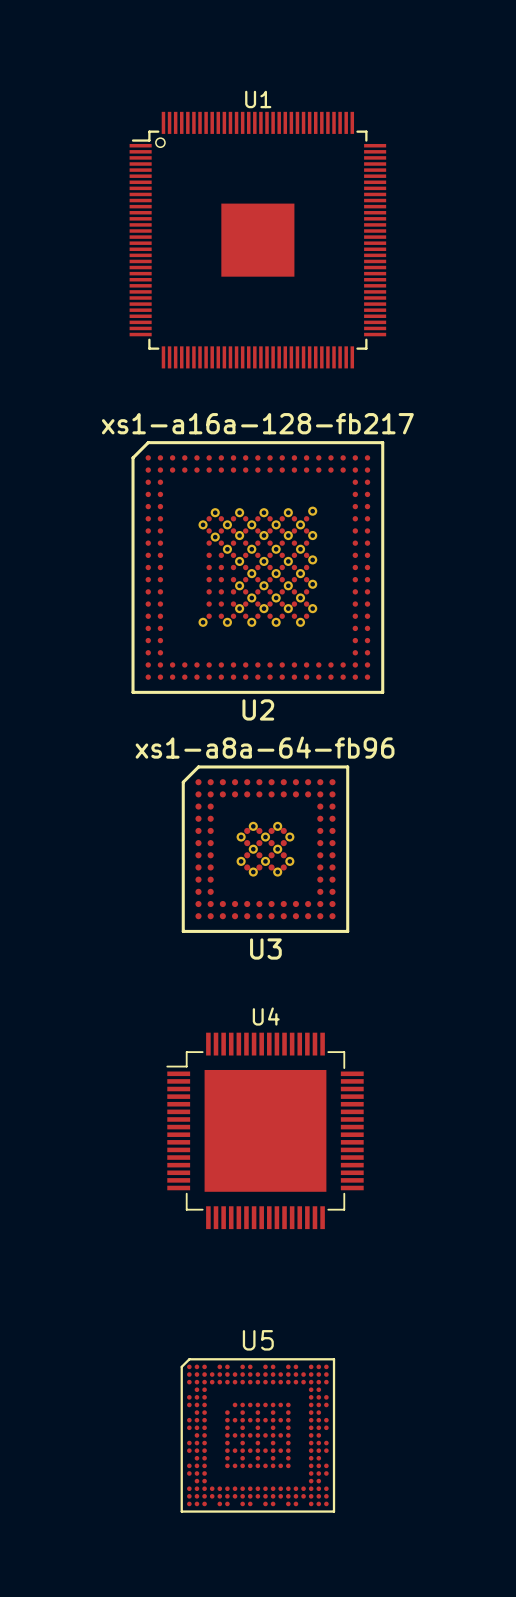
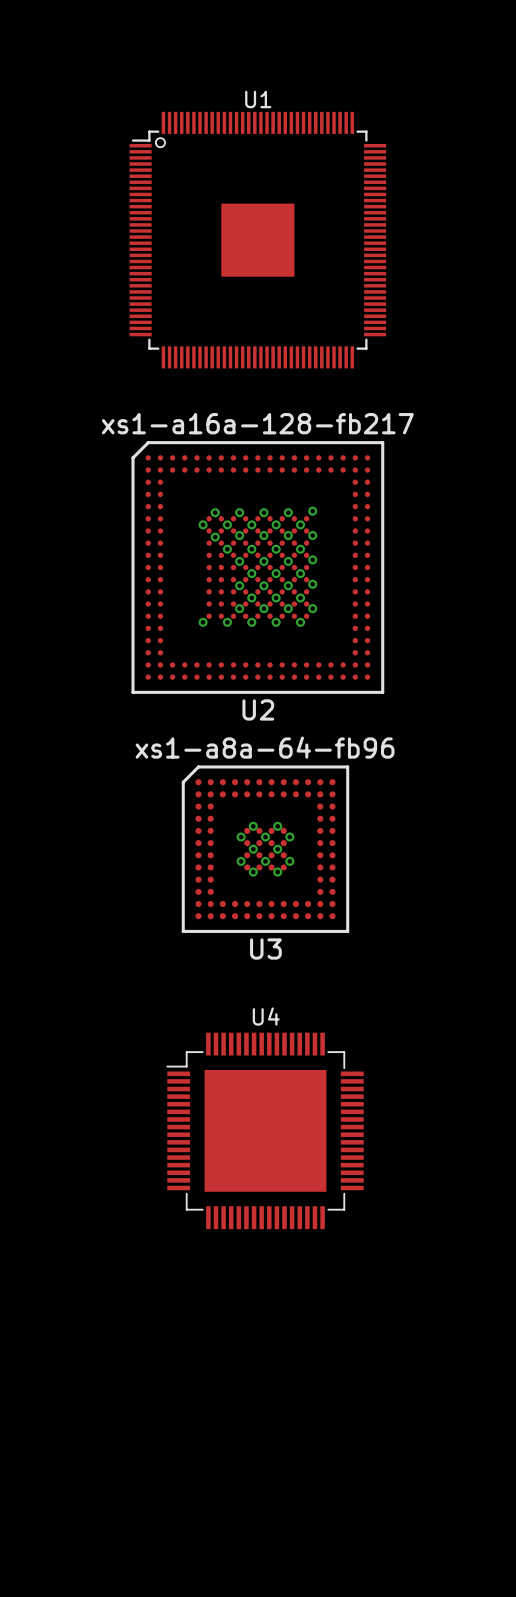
U5: (257, 1435) -> none

